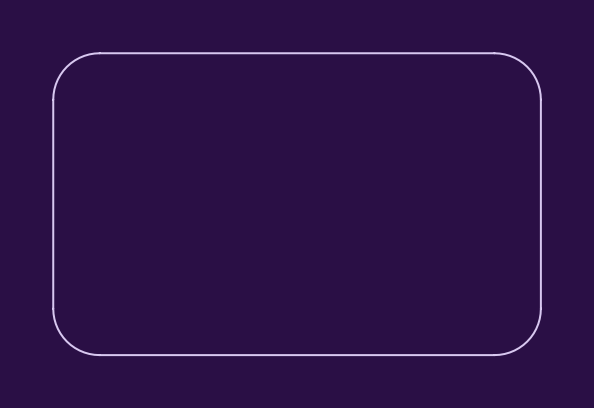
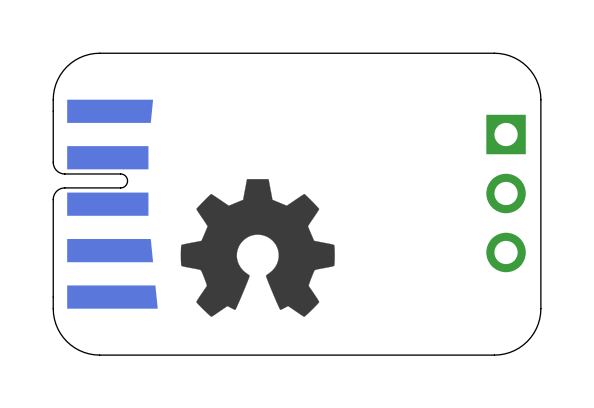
board edge: (53, 111) (53, 297) -> none
drawing: none -> [180, 179, 335, 317]
part: none -> (506, 193)
part: none -> (105, 204)

